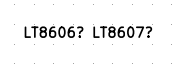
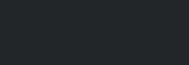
text: LT8606? LT8607? (88, 32) -> none

